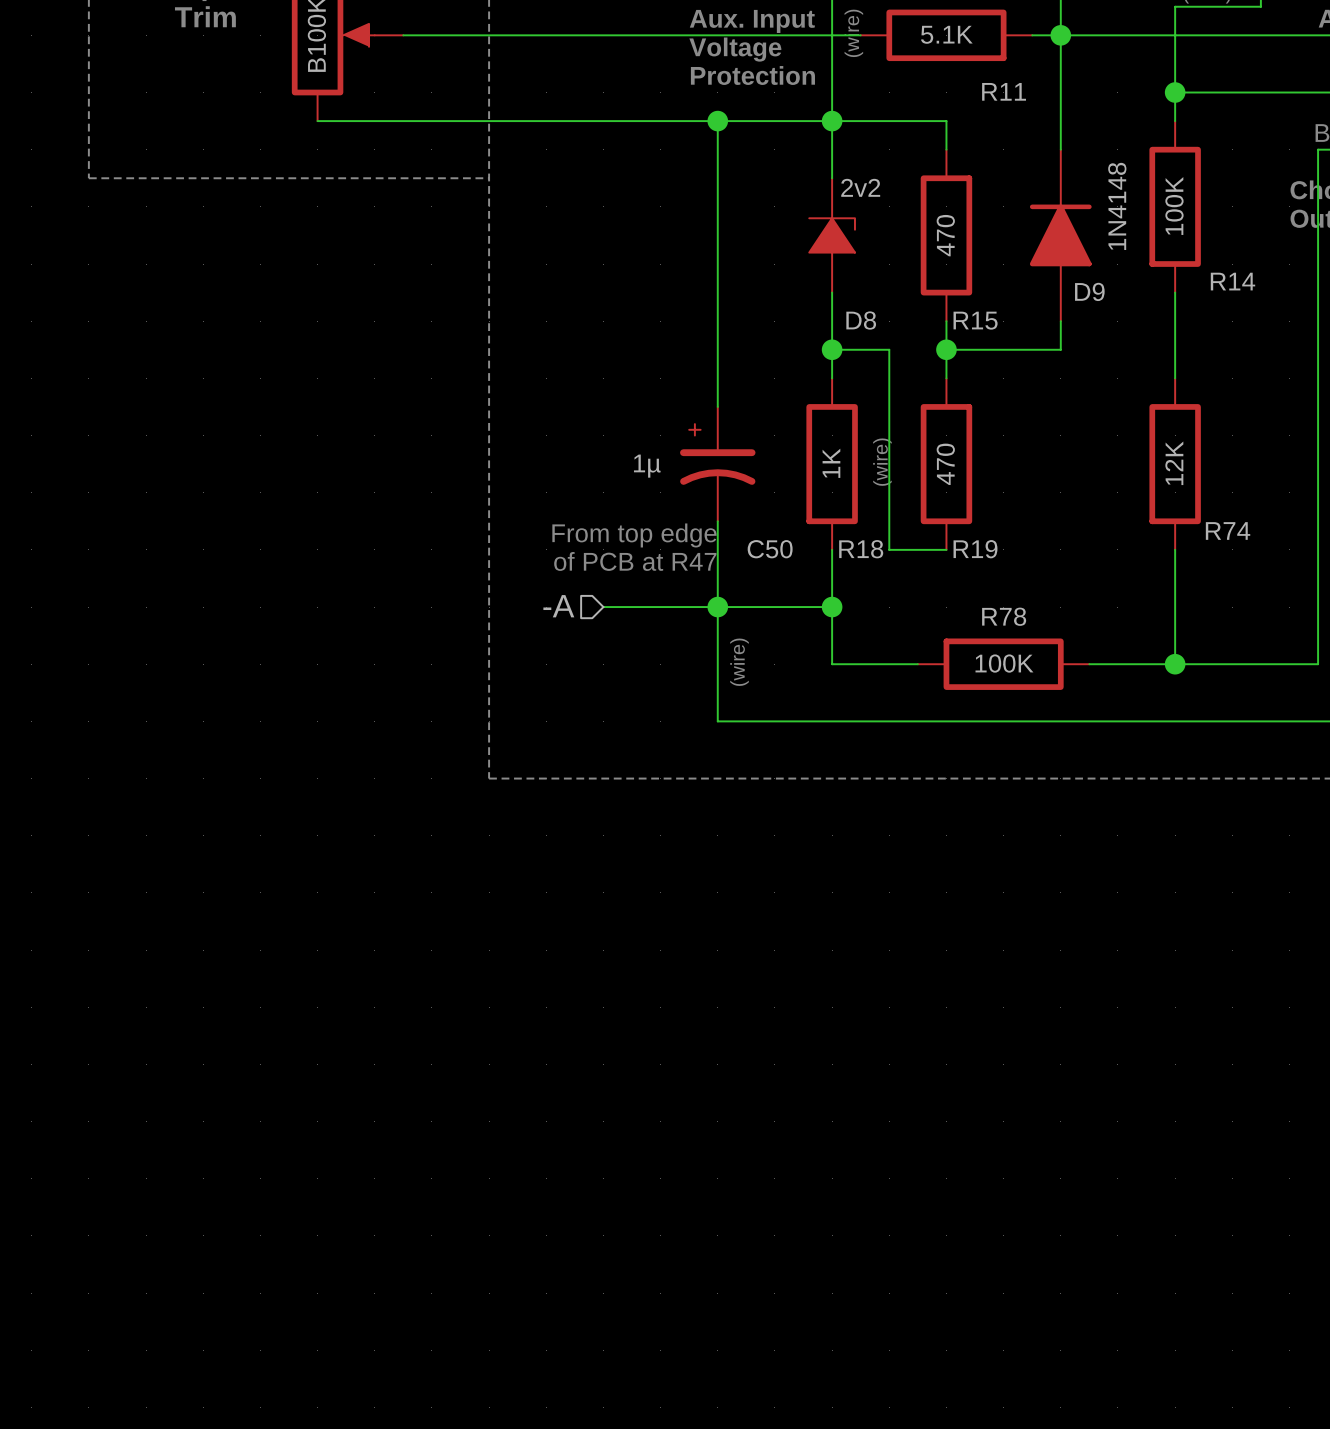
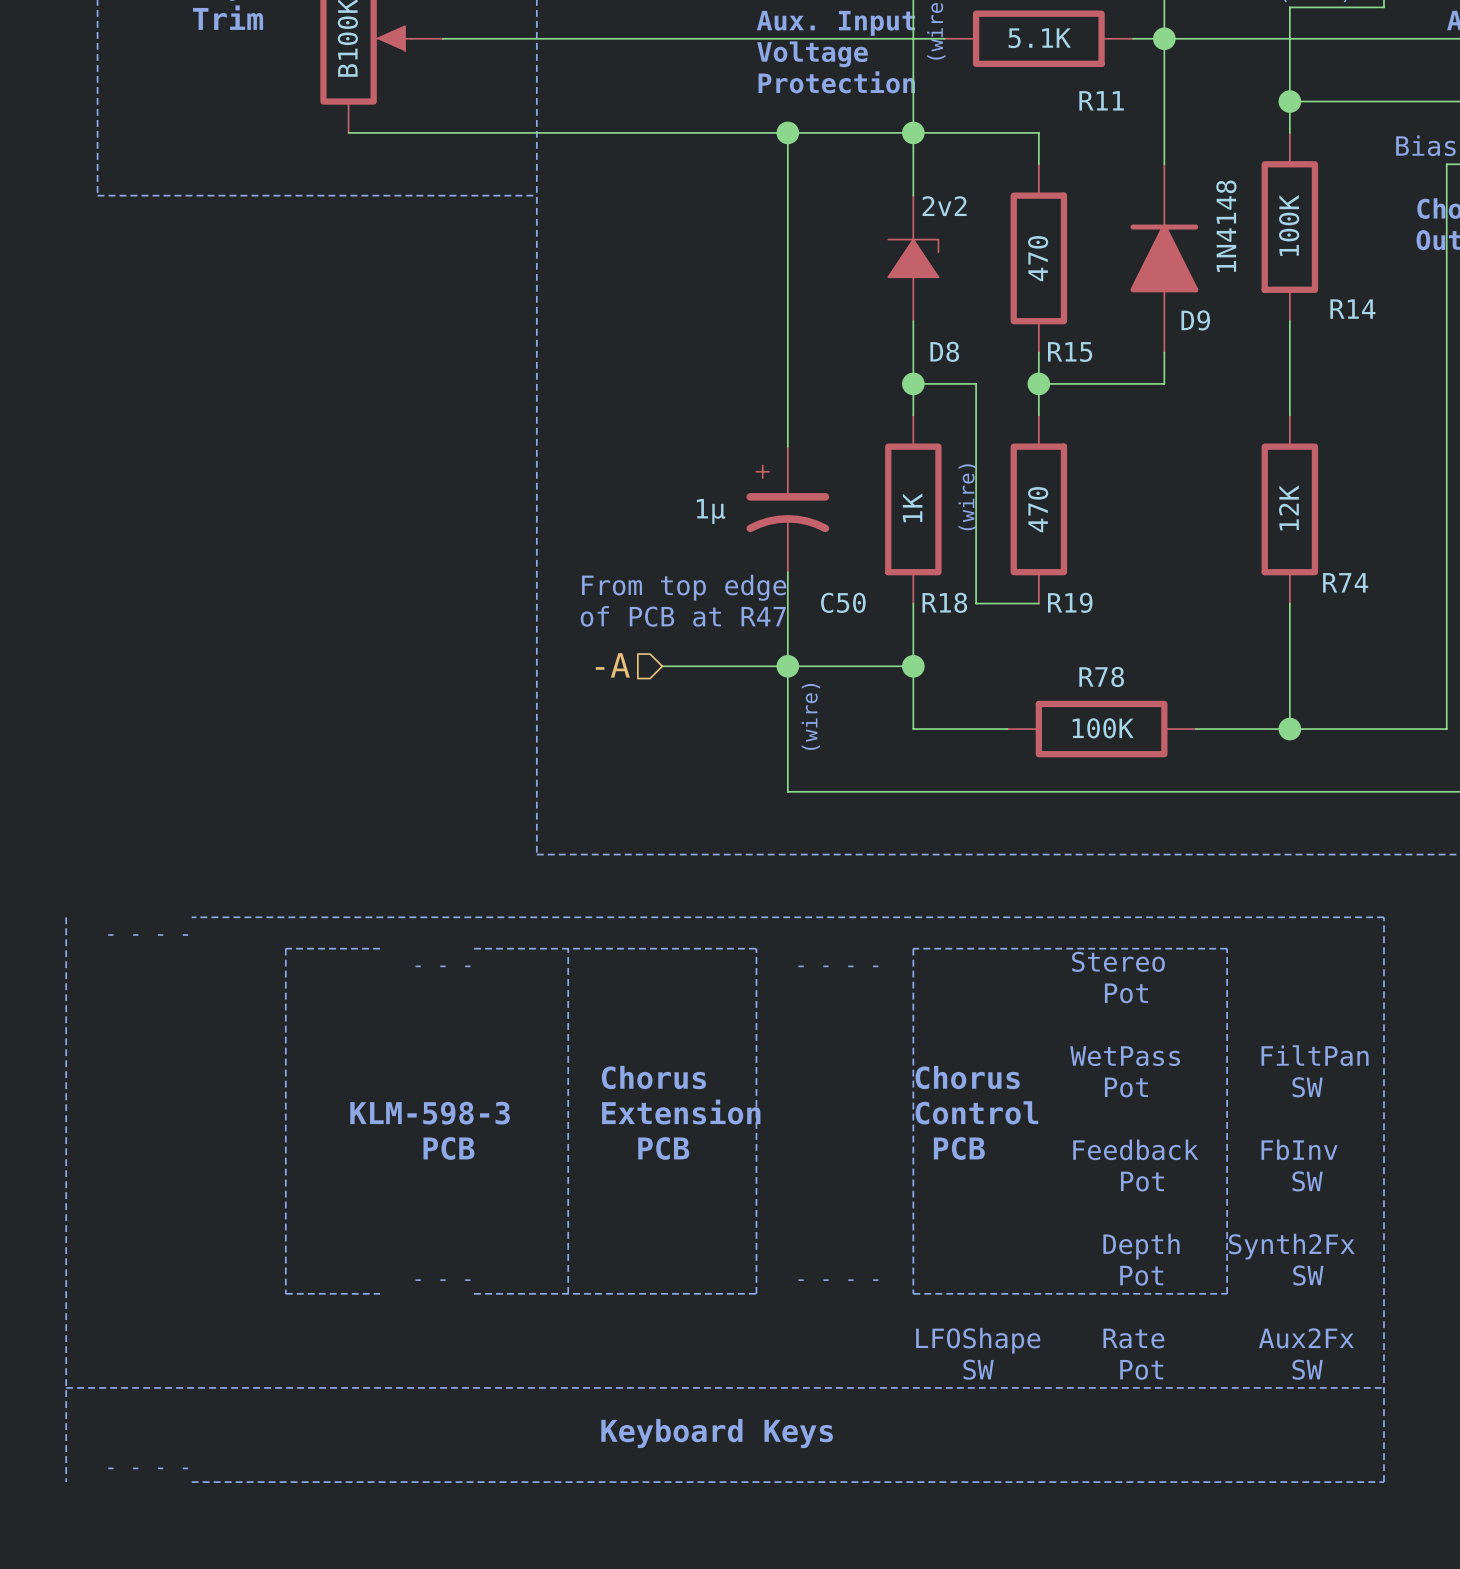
line: none -> (66, 917) (66, 1482)
line: none -> (191, 917) (1383, 917) (1383, 1482) (191, 1482)
text: none -> - - - - (148, 935)
line: none -> (379, 948) (285, 948) (285, 1293) (379, 1293)
line: none -> (474, 948) (756, 948) (756, 1293) (474, 1293)
line: none -> (568, 948) (568, 1293)
line: none -> (913, 948) (1227, 948) (1227, 1293) (913, 1293) (913, 948)
text: none -> Stereo (1118, 961)
text: none -> - - - (442, 966)
text: none -> - - - - (838, 966)
text: none -> Pot (1126, 993)
text: none -> FiltPan (1315, 1055)
text: none -> WetPass (1125, 1056)
text: none -> Chorus (653, 1077)
text: none -> Chorus (967, 1077)
text: none -> Pot (1126, 1087)
text: none -> SW (1307, 1087)
text: none -> Extension (681, 1112)
text: none -> Control (976, 1112)
text: none -> KLM-598-3 (430, 1113)
text: none -> PCB (448, 1148)
text: none -> PCB (663, 1148)
text: none -> PCB (959, 1148)
text: none -> Feedback (1135, 1149)
text: none -> FbInv (1299, 1149)
text: none -> Pot (1142, 1181)
text: none -> SW (1307, 1181)
text: none -> Depth (1141, 1246)
text: none -> Synth2Fx (1291, 1246)
text: none -> Pot (1141, 1275)
text: none -> SW (1308, 1275)
text: none -> - - - (442, 1280)
text: none -> - - - - (838, 1280)
text: none -> Rate (1133, 1338)
text: none -> Aux2Fx (1306, 1338)
text: none -> LFOShape (978, 1340)
text: none -> SW (978, 1369)
text: none -> Pot (1141, 1369)
text: none -> SW (1307, 1369)
line: none -> (66, 1387) (1383, 1387)
text: none -> Keyboard Keys (717, 1433)
text: none -> - - - - (148, 1468)

